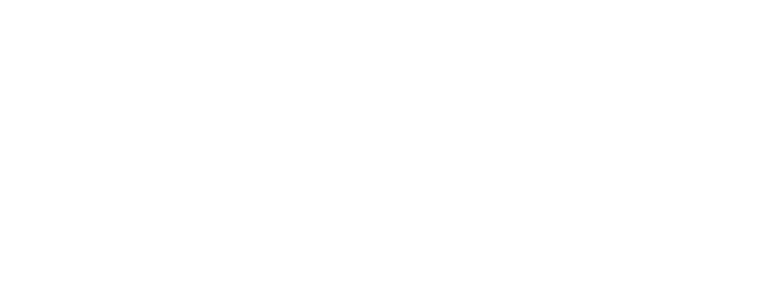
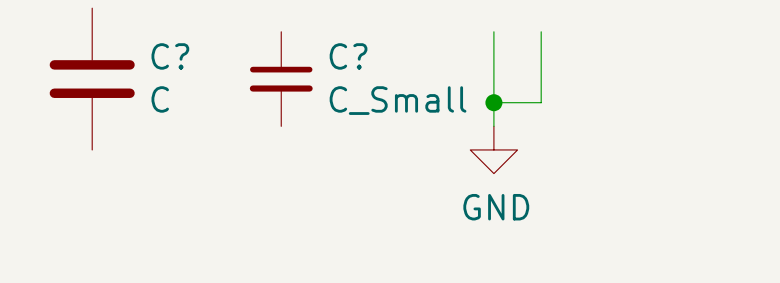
wire: none -> (493, 31) (493, 126)
wire: none -> (541, 31) (541, 102) (493, 102)
C?: none -> C (92, 79)
C?: none -> C_Small (281, 79)
junction: none -> (493, 102)
power symbol: none -> GND (493, 149)

